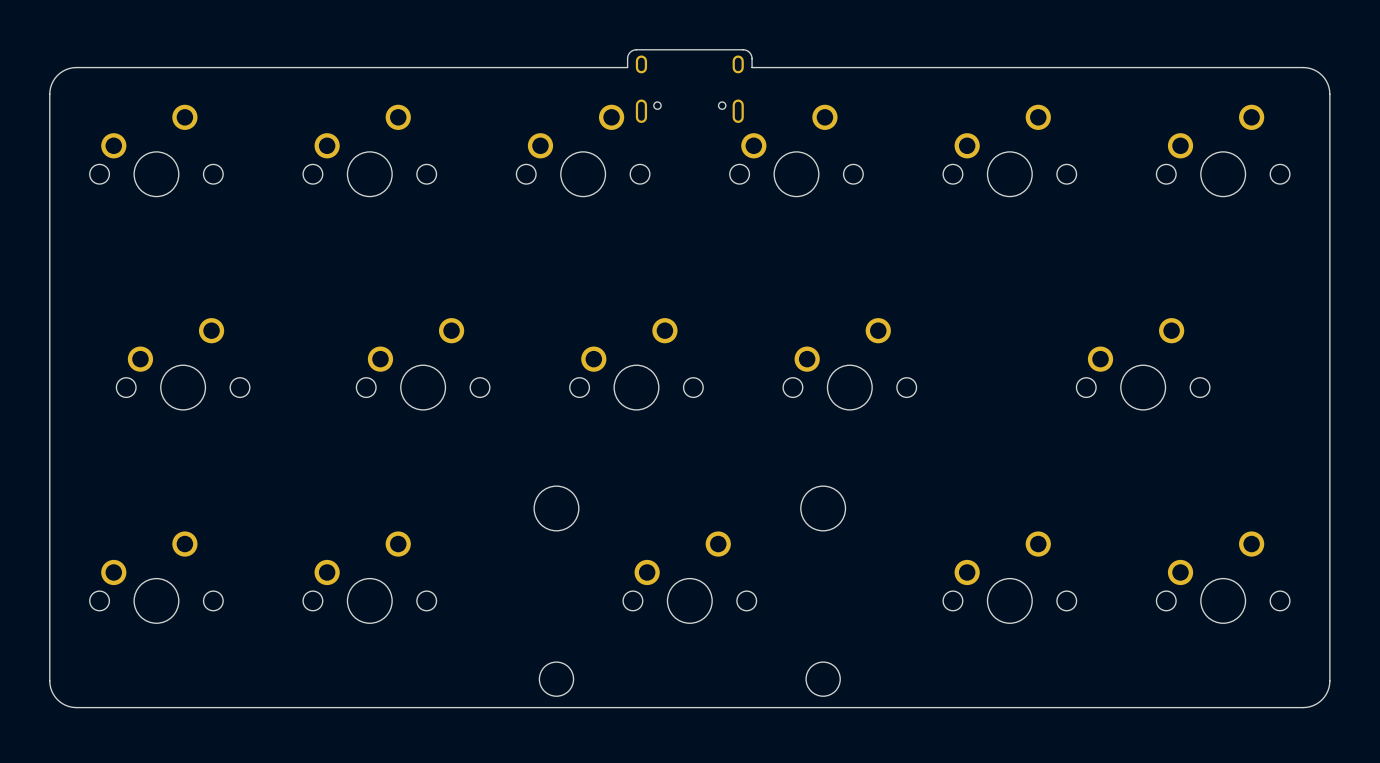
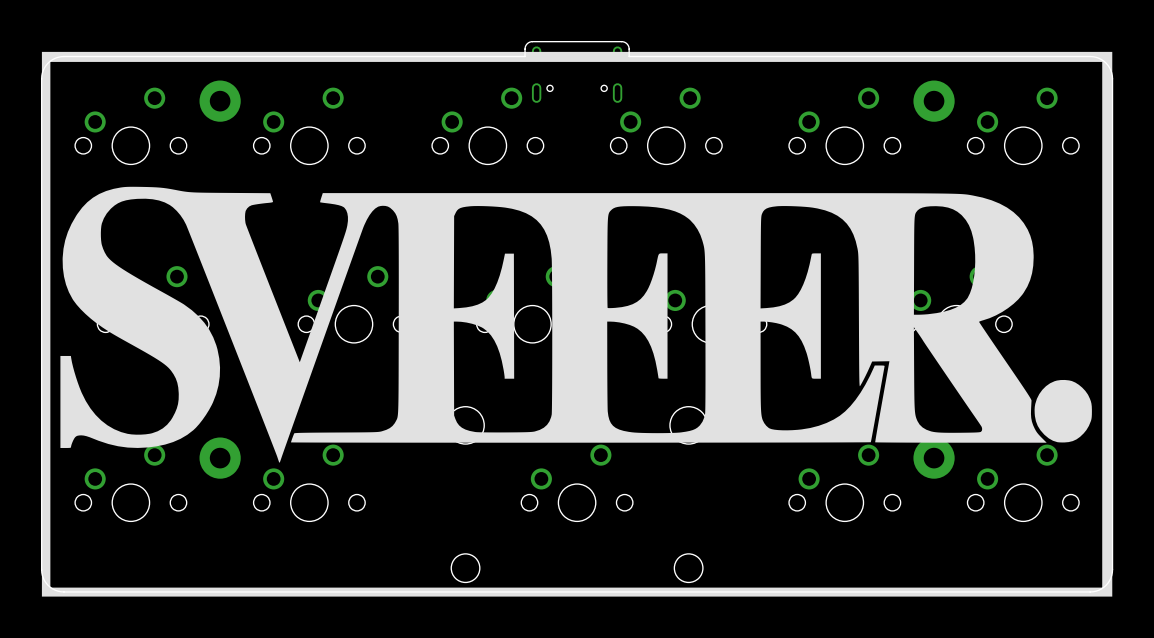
part: none -> (220, 101)
part: none -> (934, 101)
part: none -> (577, 324)
part: none -> (220, 458)
part: none -> (934, 458)

